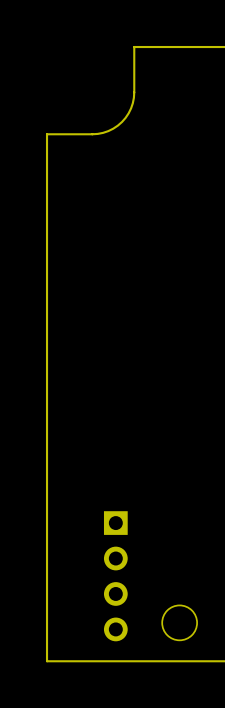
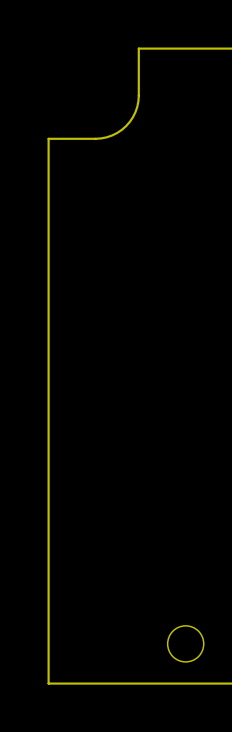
part: (115, 576) -> none

